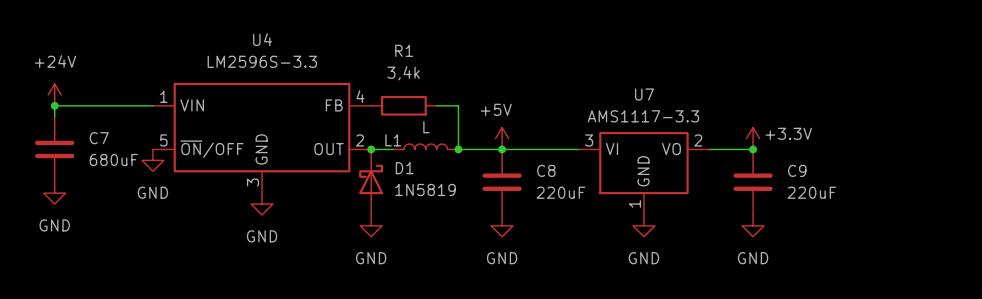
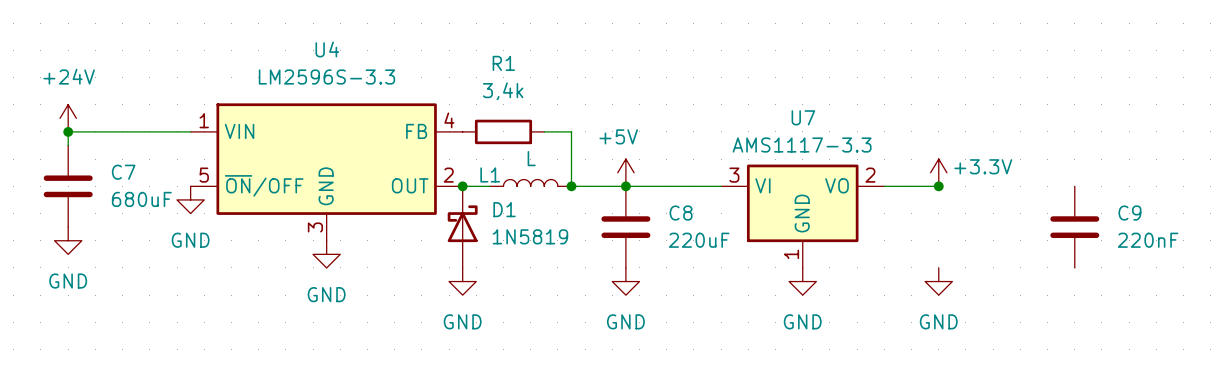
C9 position: (753, 182) -> (1074, 227)
C9 value: 220uF (811, 192) -> 220nF (1148, 240)

